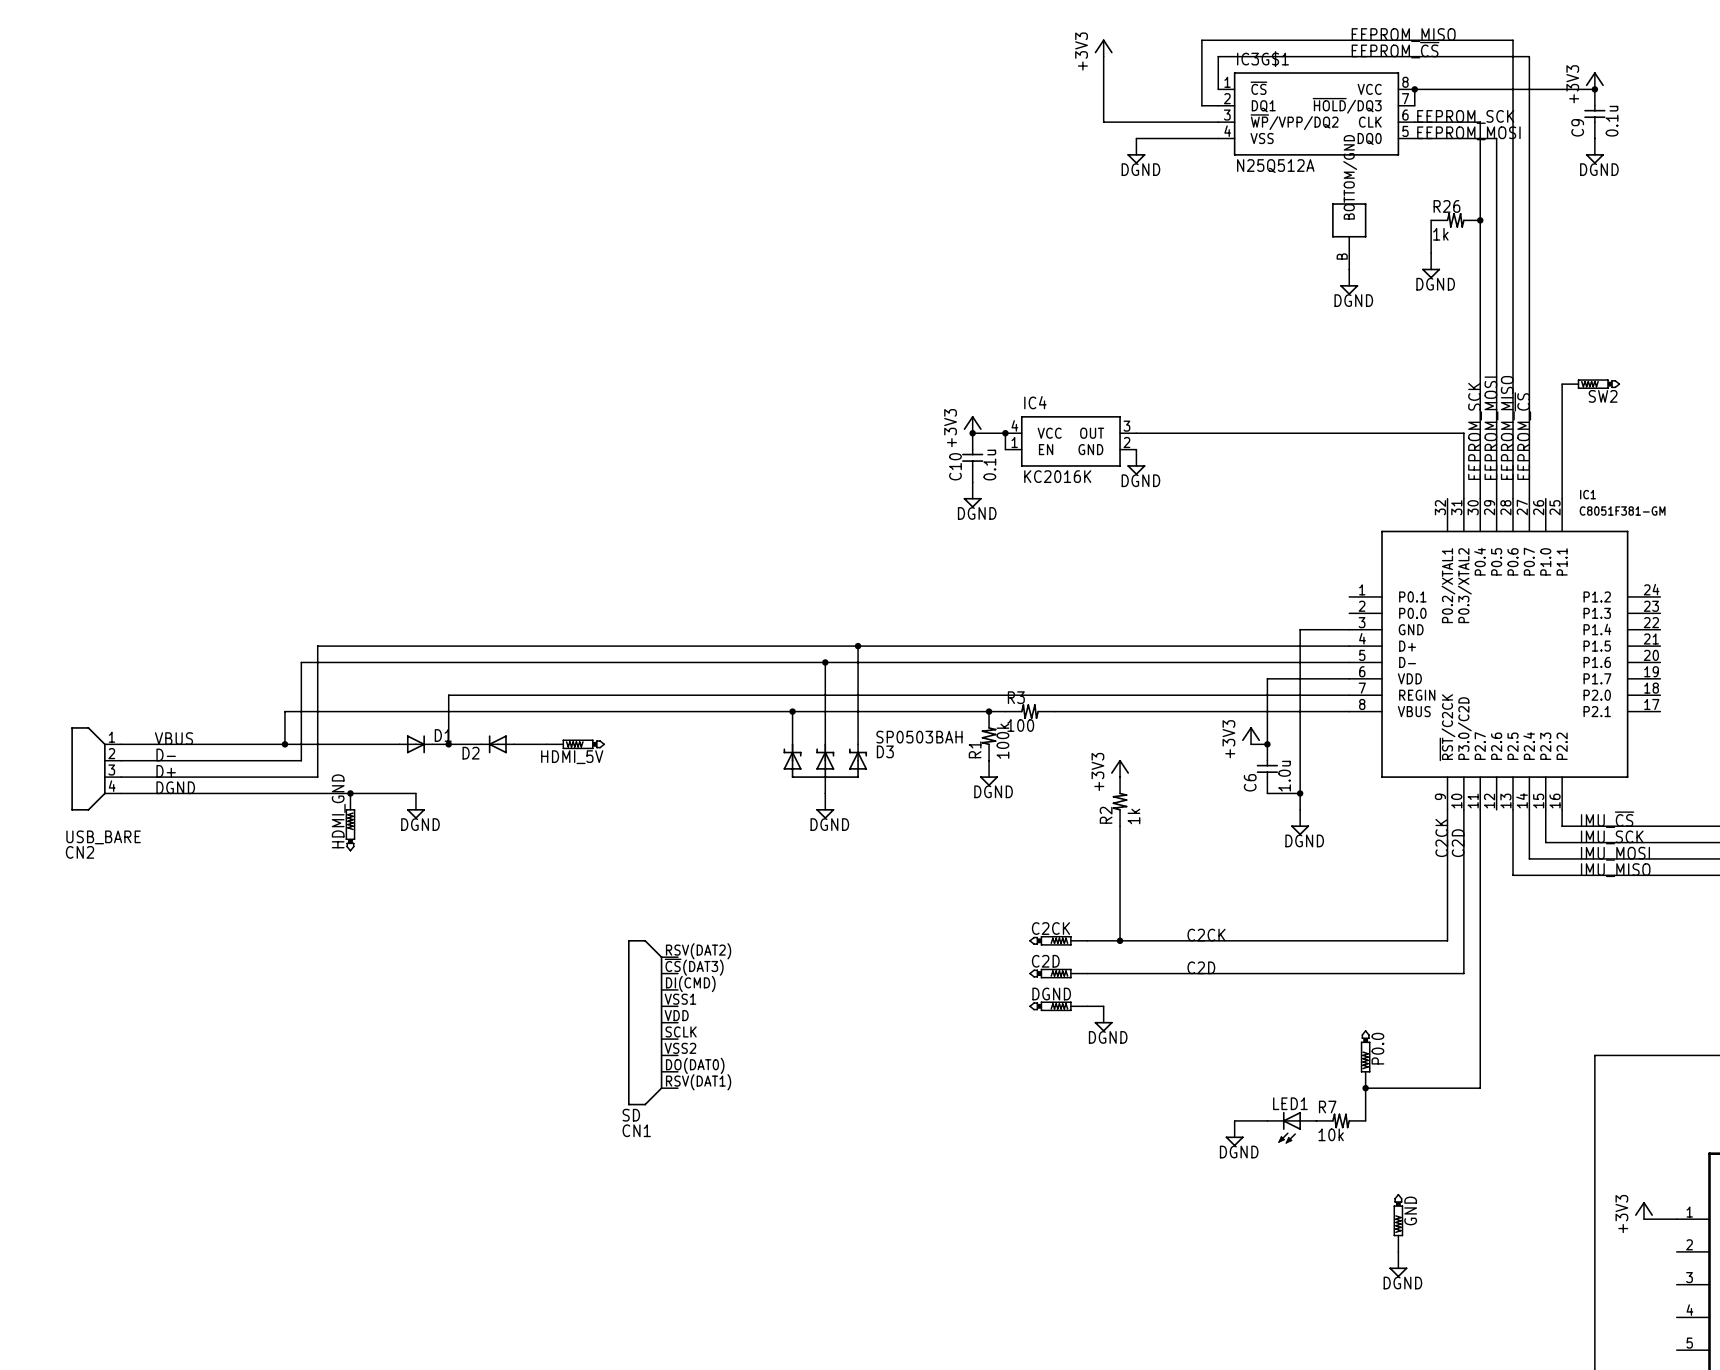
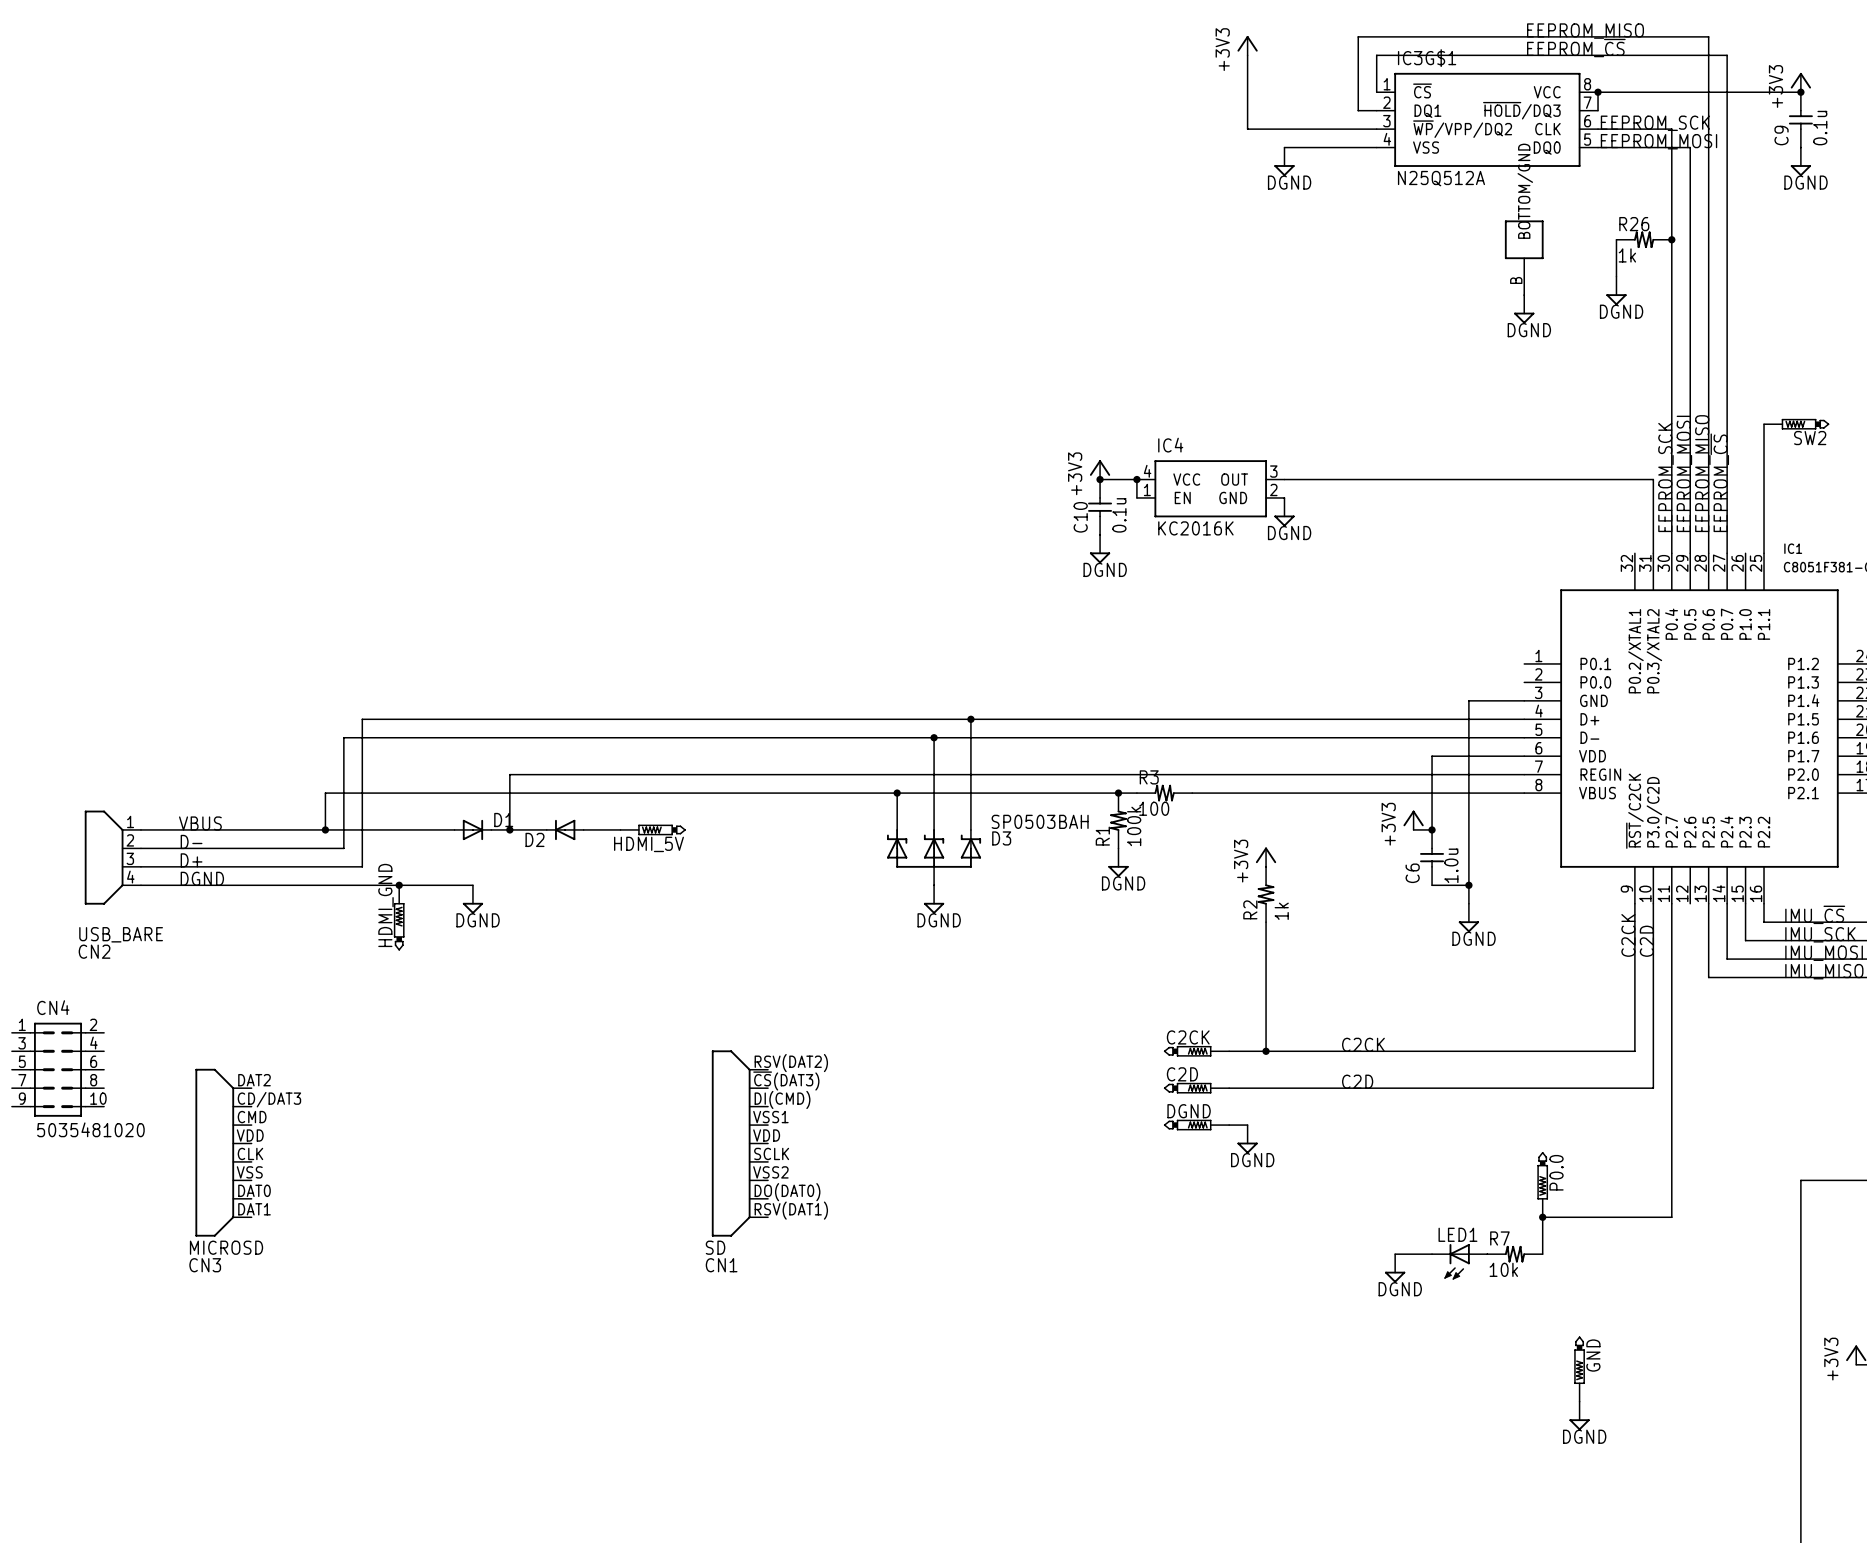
CN4: none -> 5035481020 (57, 1069)
CN3: none -> MICROSD (223, 1152)

